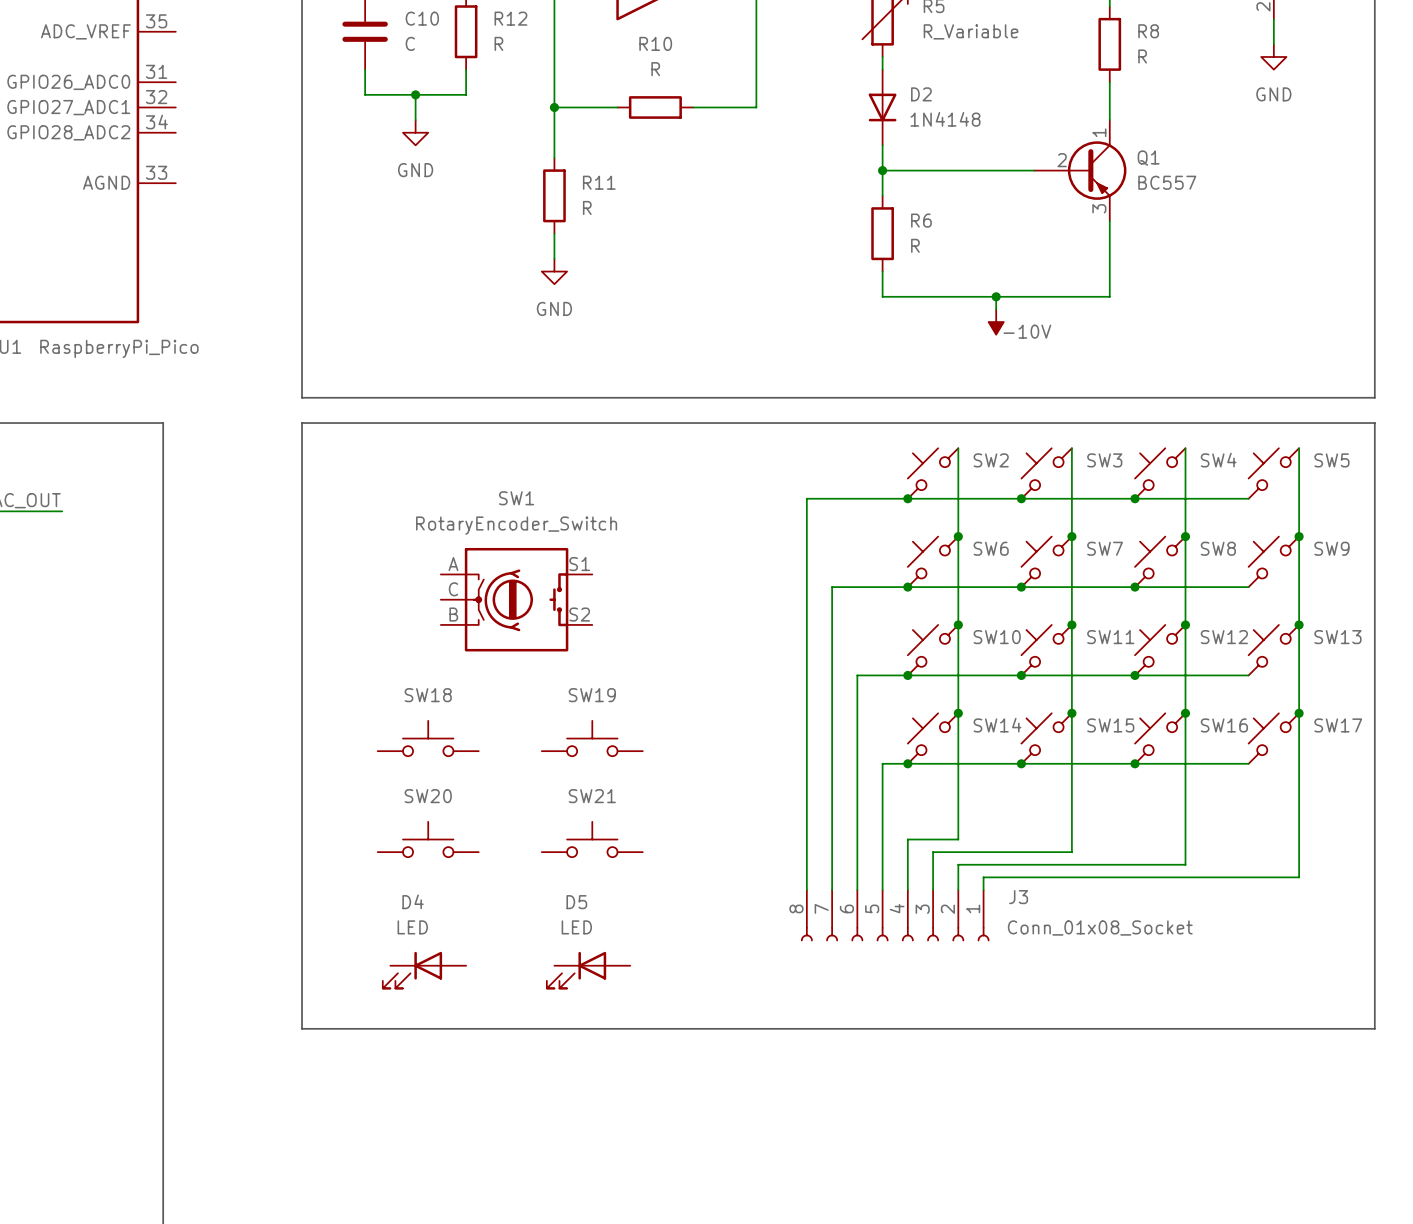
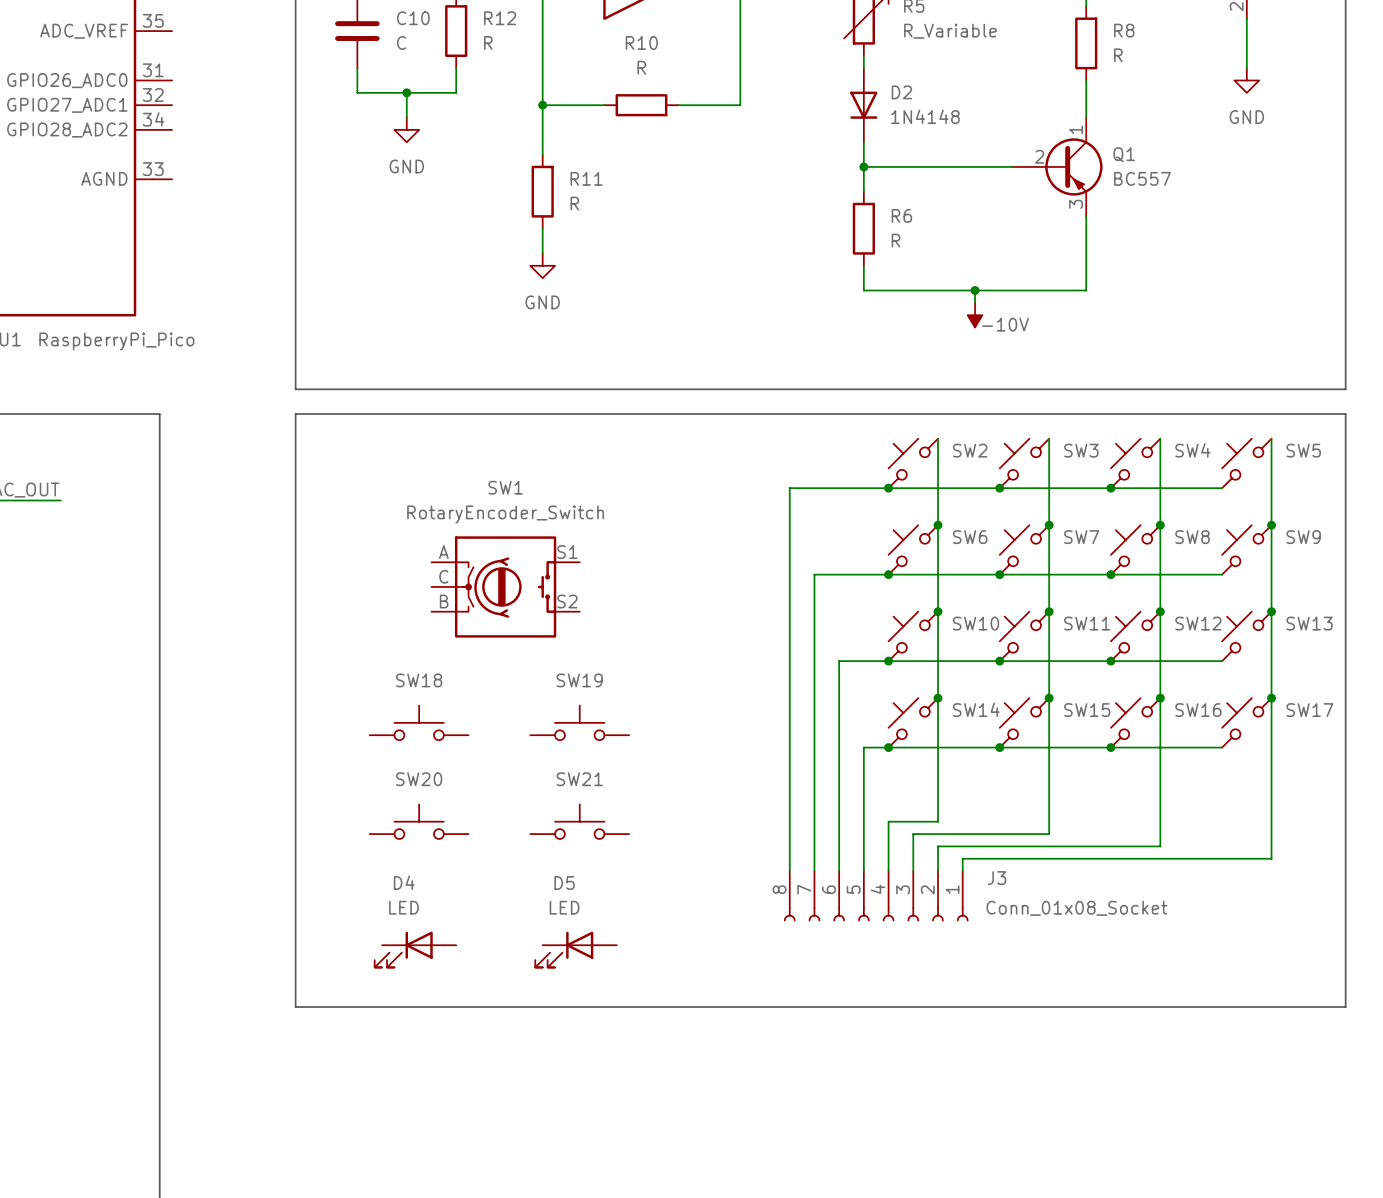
power symbol position: GND (1273, 56) -> GND (1246, 80)

